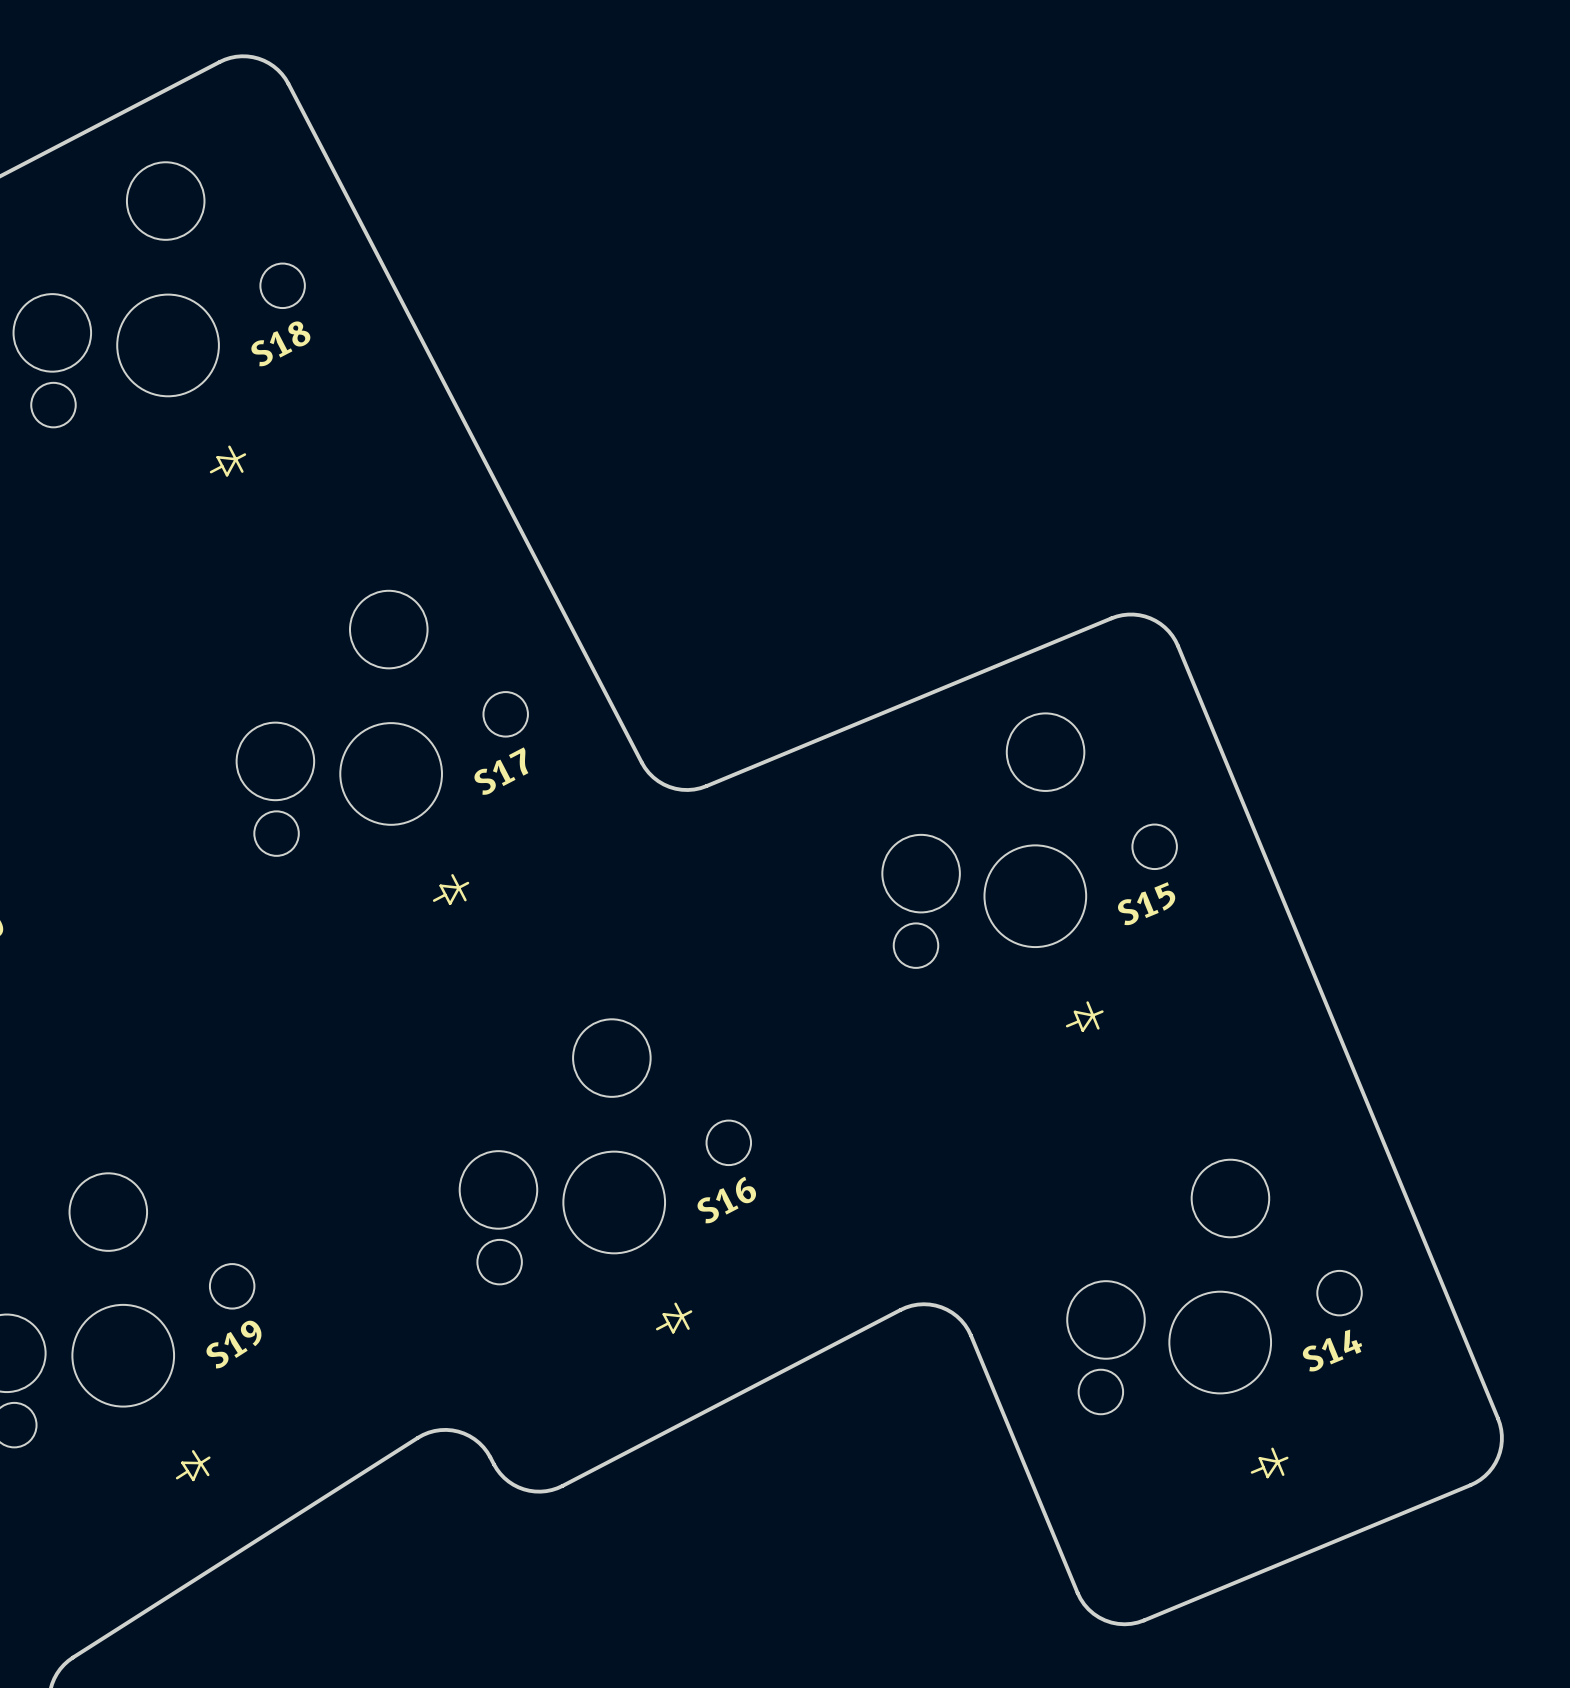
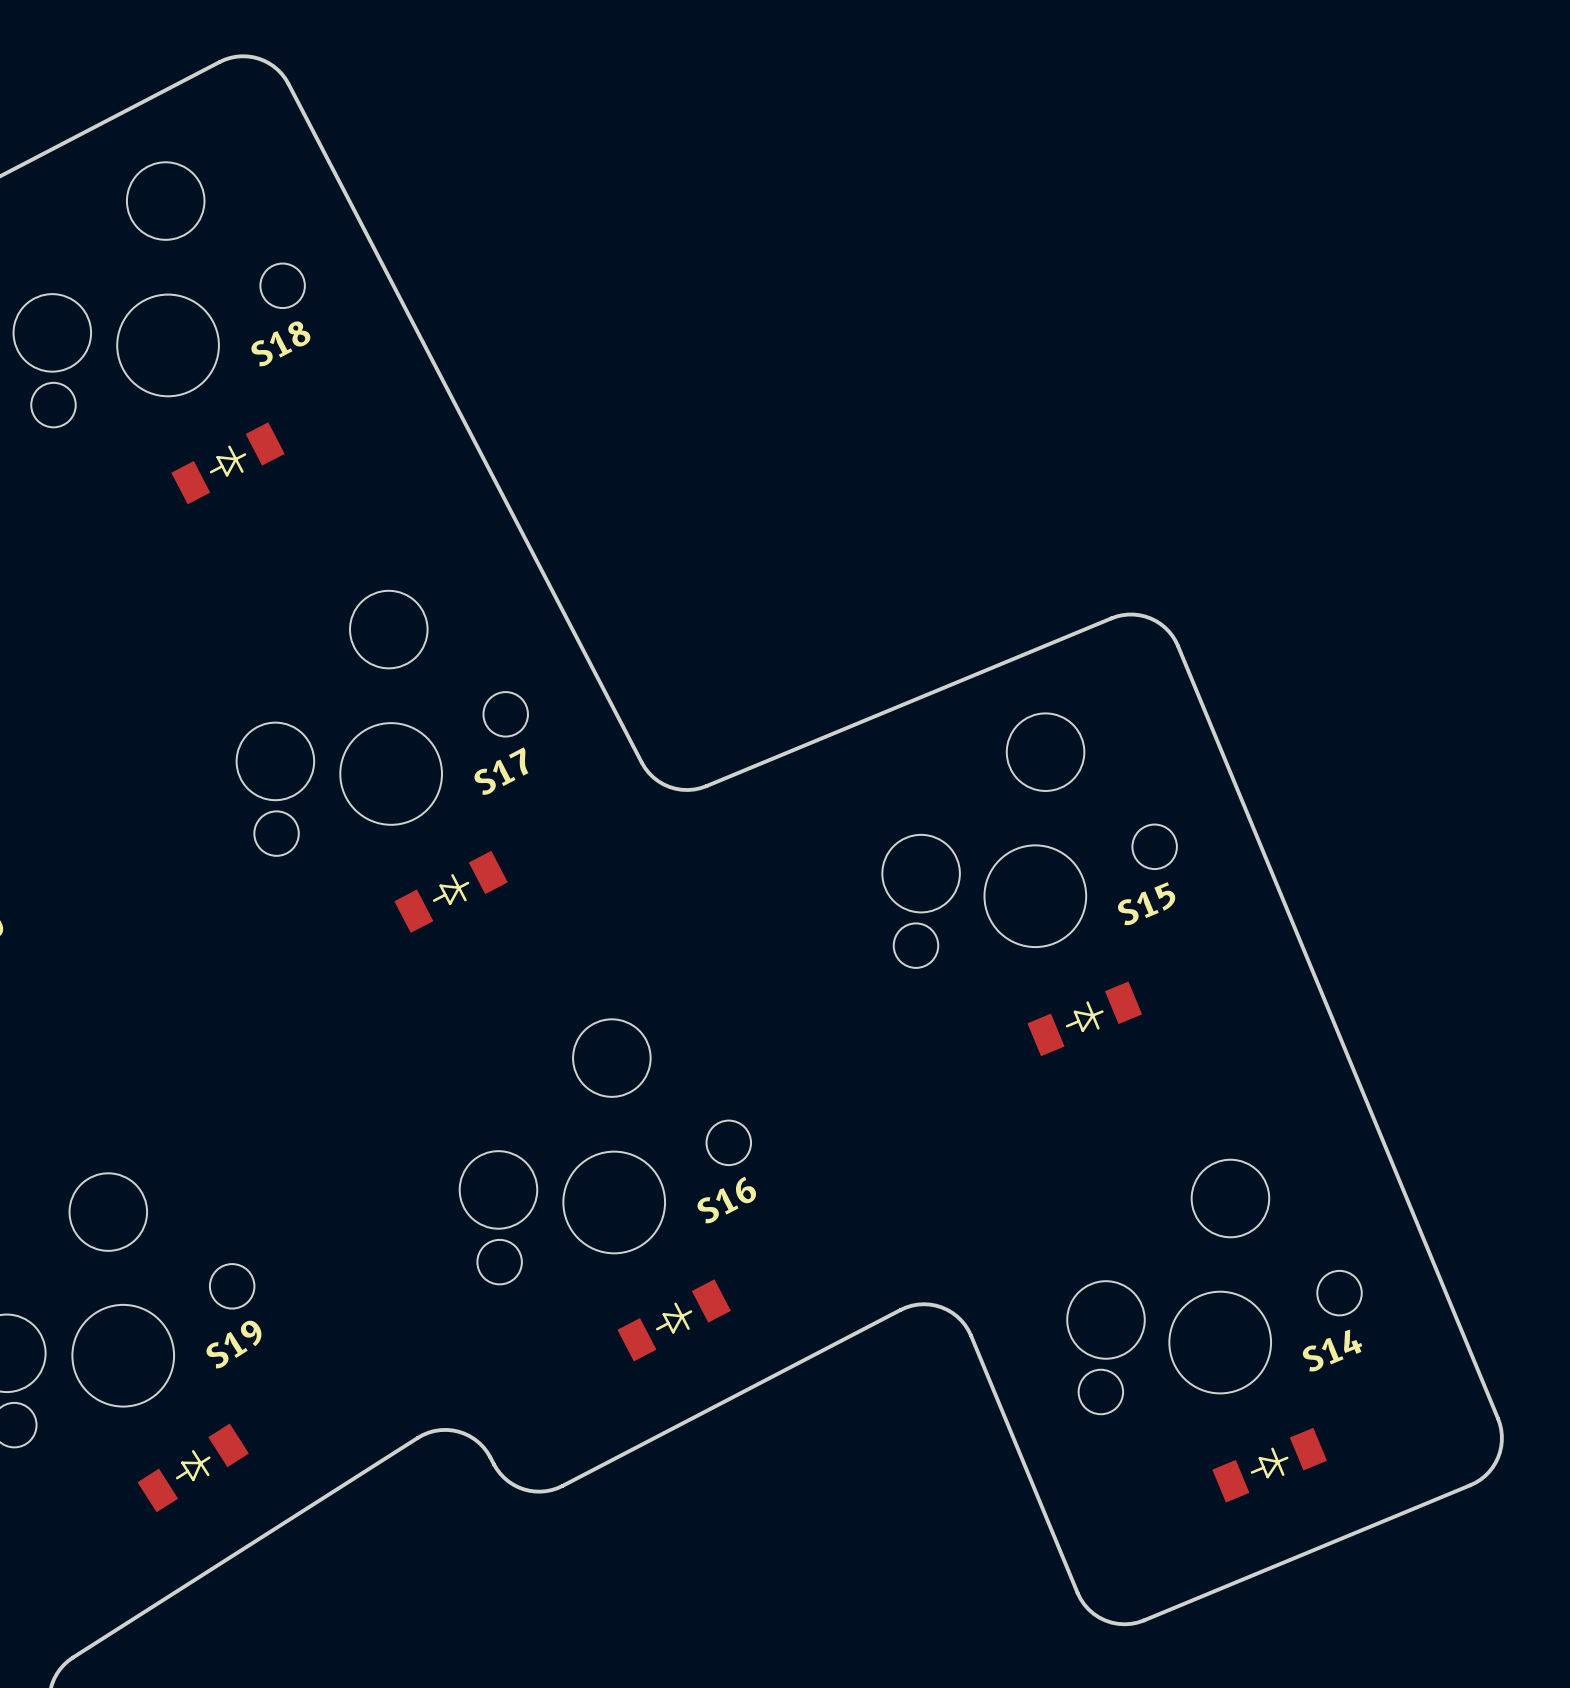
part footprint: [209, 445, 247, 477] -> [171, 422, 285, 505]
part footprint: [432, 874, 470, 906] -> [394, 850, 508, 933]
part footprint: [1065, 1001, 1104, 1032] -> [1027, 981, 1143, 1057]
part footprint: [655, 1302, 693, 1334] -> [617, 1279, 731, 1362]
part footprint: [1250, 1447, 1289, 1479] -> [1212, 1427, 1327, 1503]
part footprint: [175, 1450, 211, 1482] -> [137, 1423, 249, 1513]

